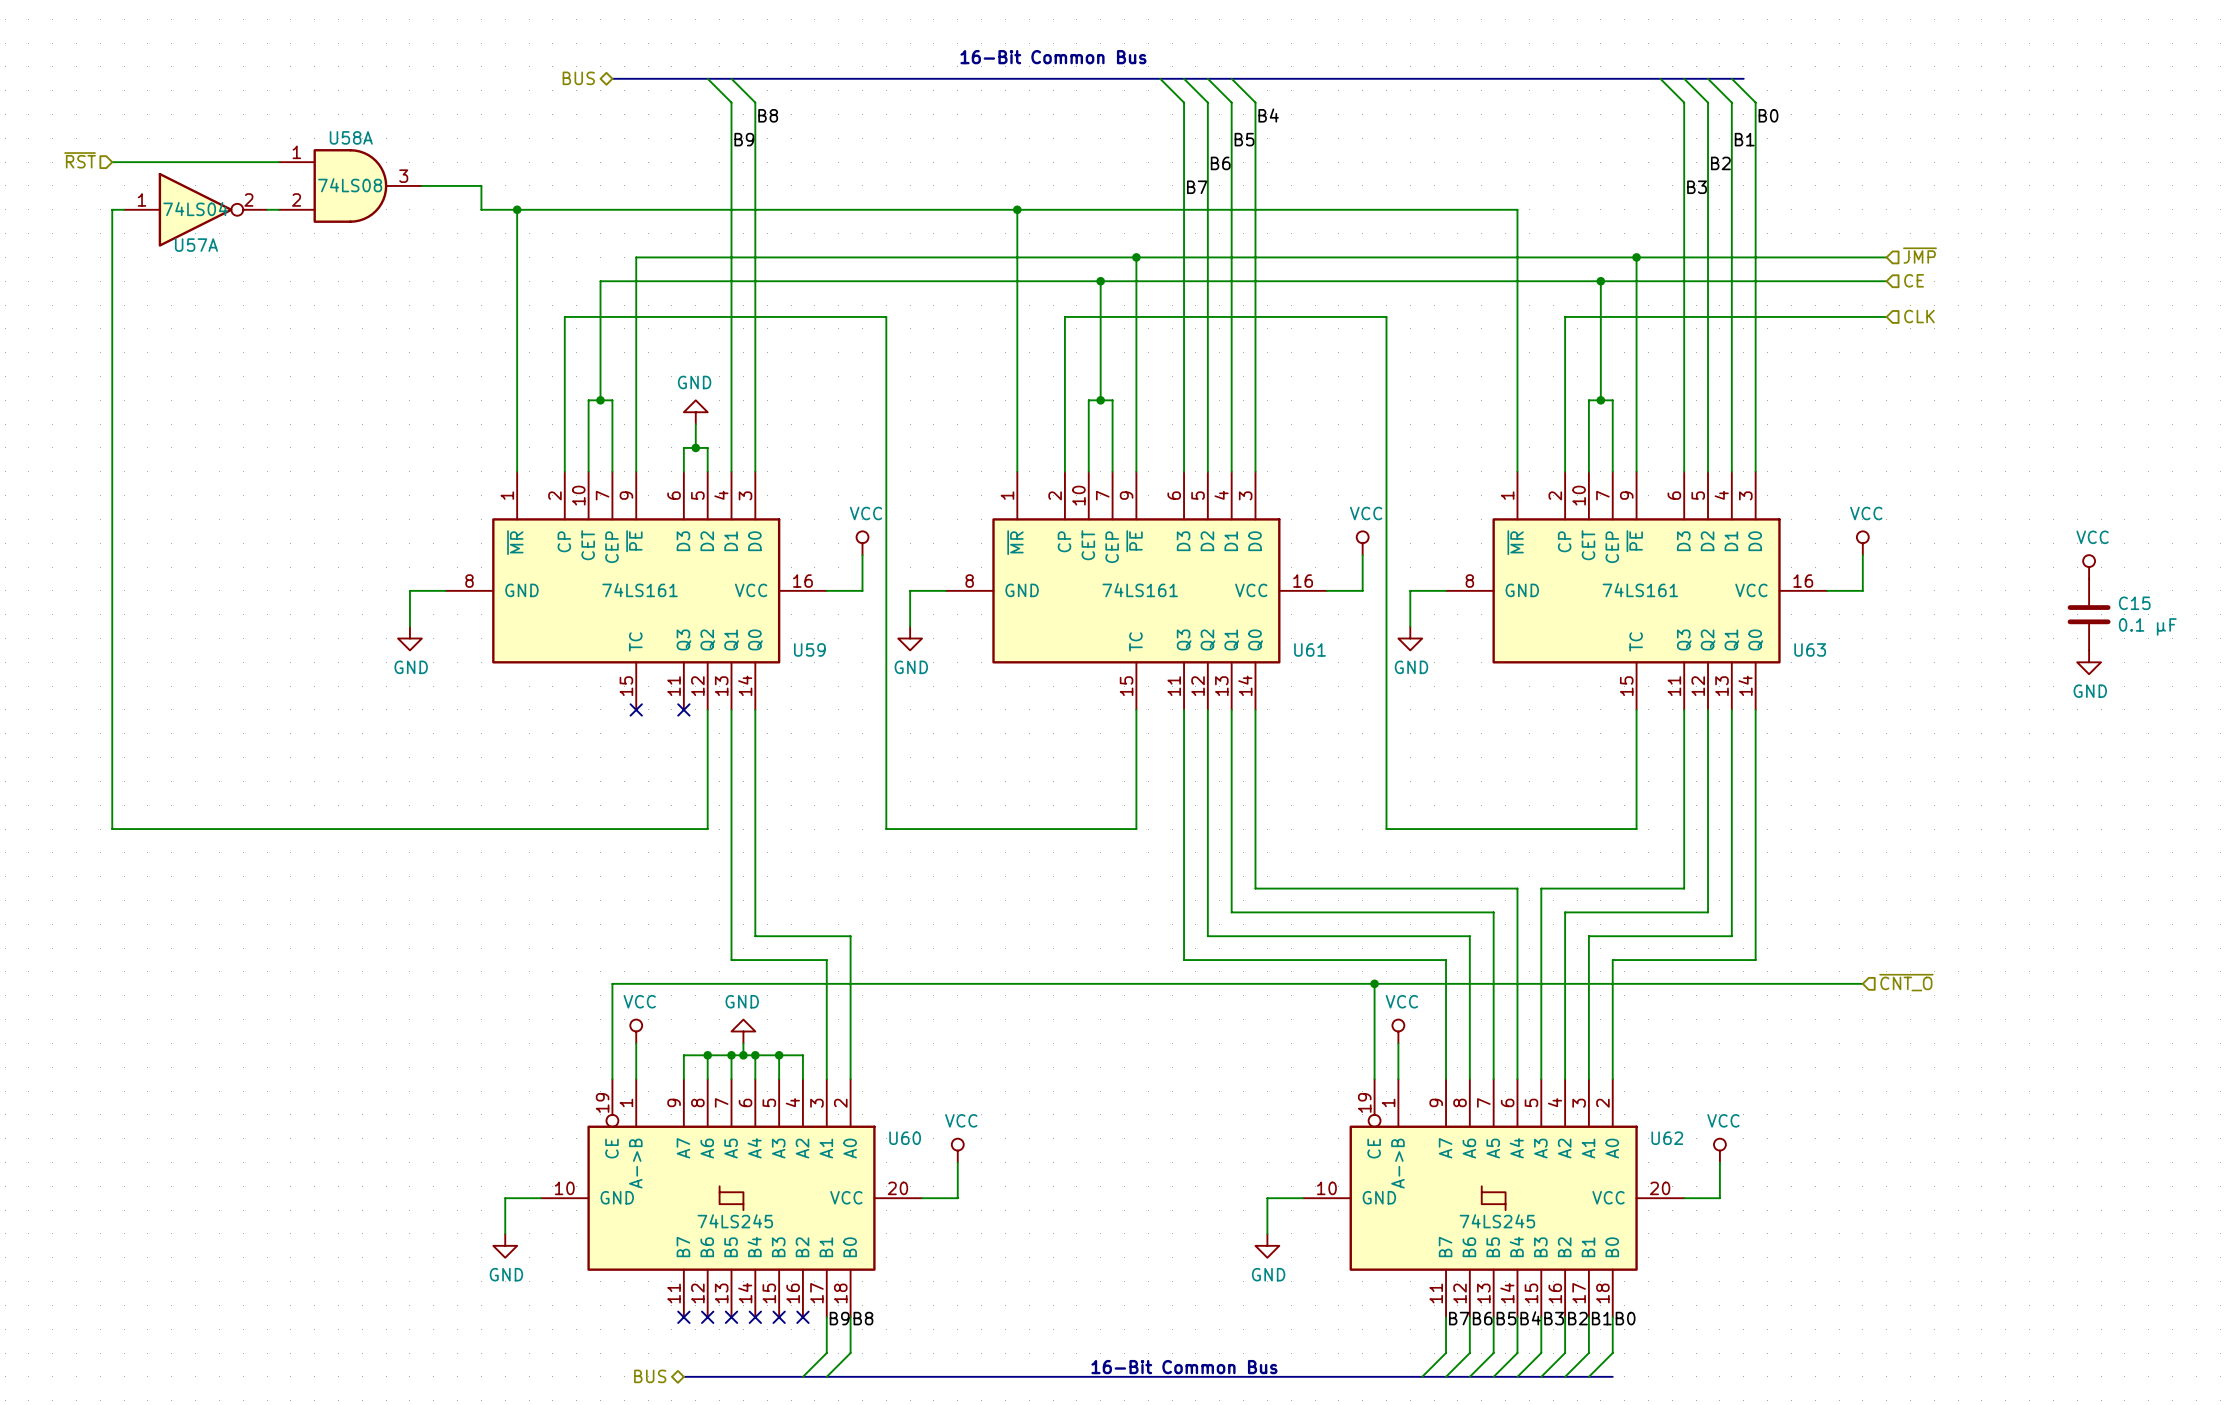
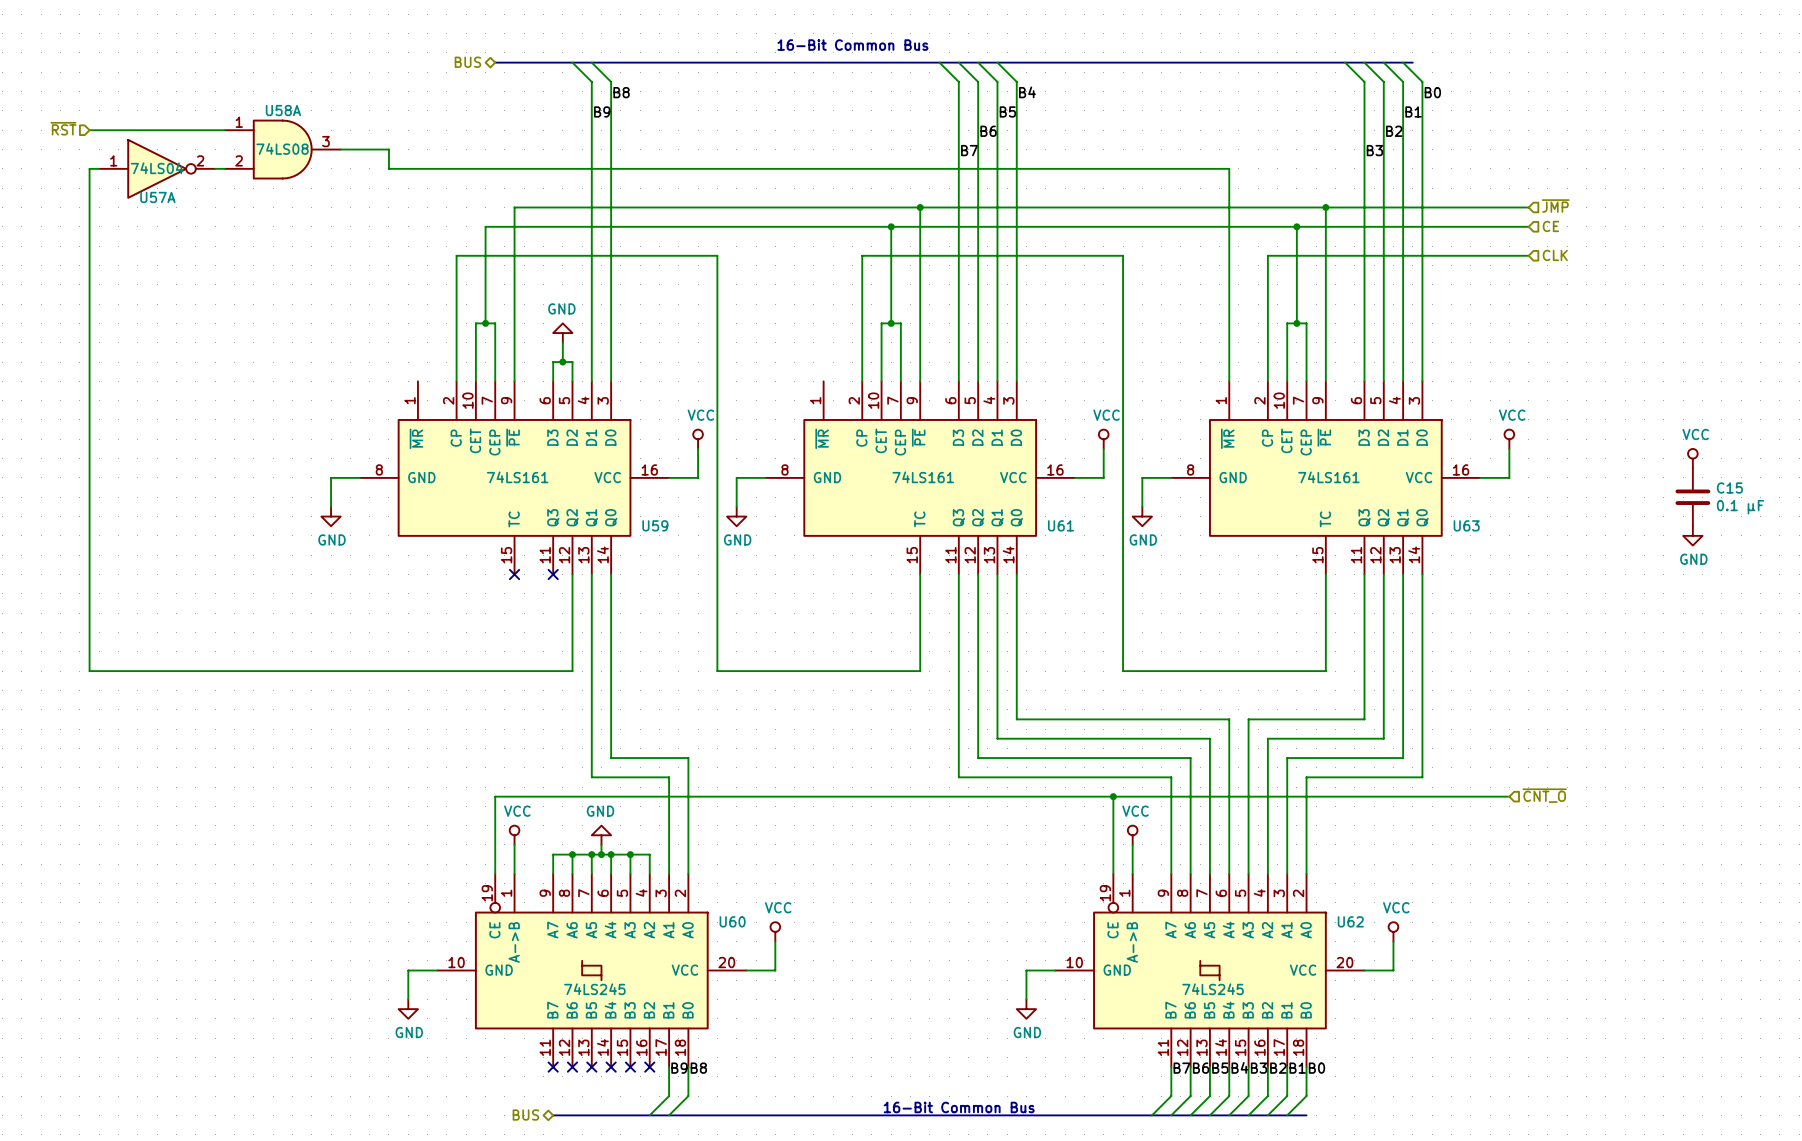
wire: (517, 209) (517, 471) -> none
junction: (517, 209) -> none
wire: (1017, 209) (1017, 471) -> none
junction: (1017, 209) -> none

